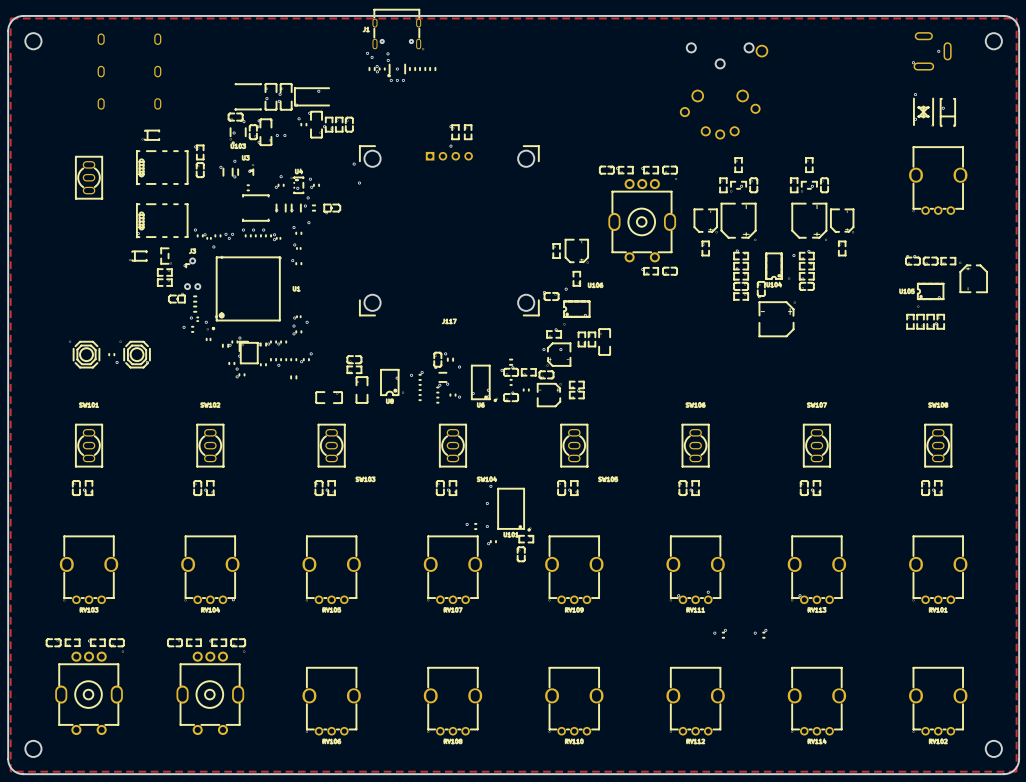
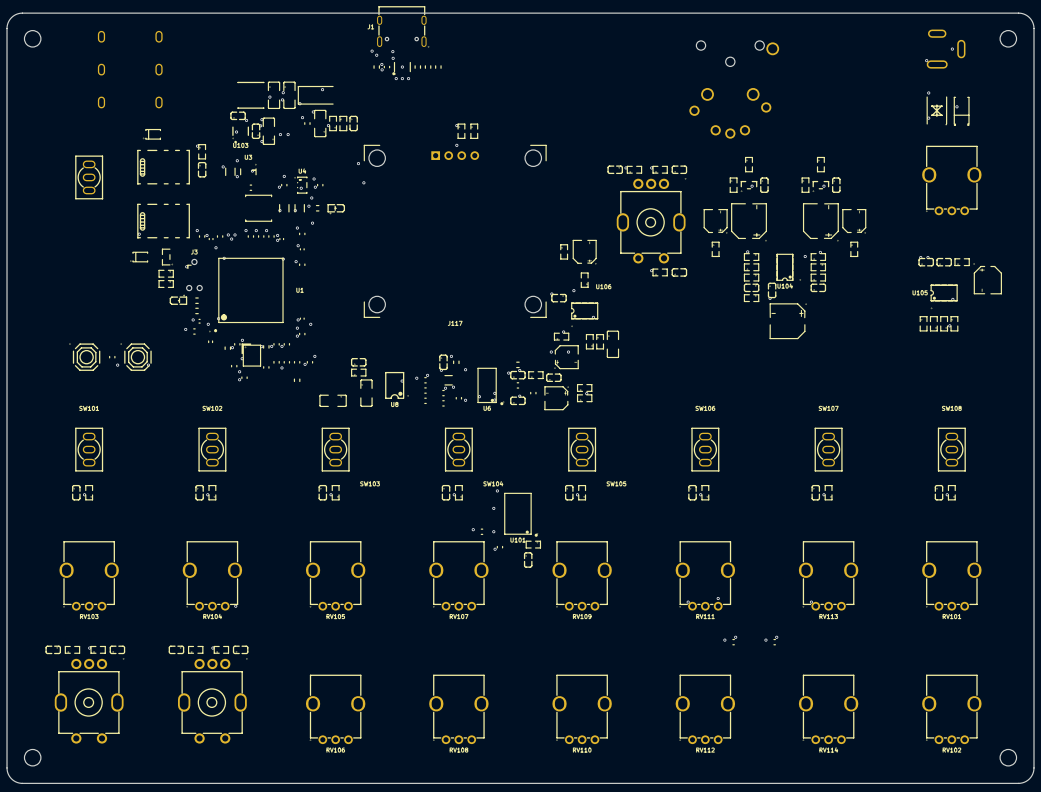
zone outline: (10, 18) (1016, 18) (1016, 771) (10, 771) (10, 18) -> none

